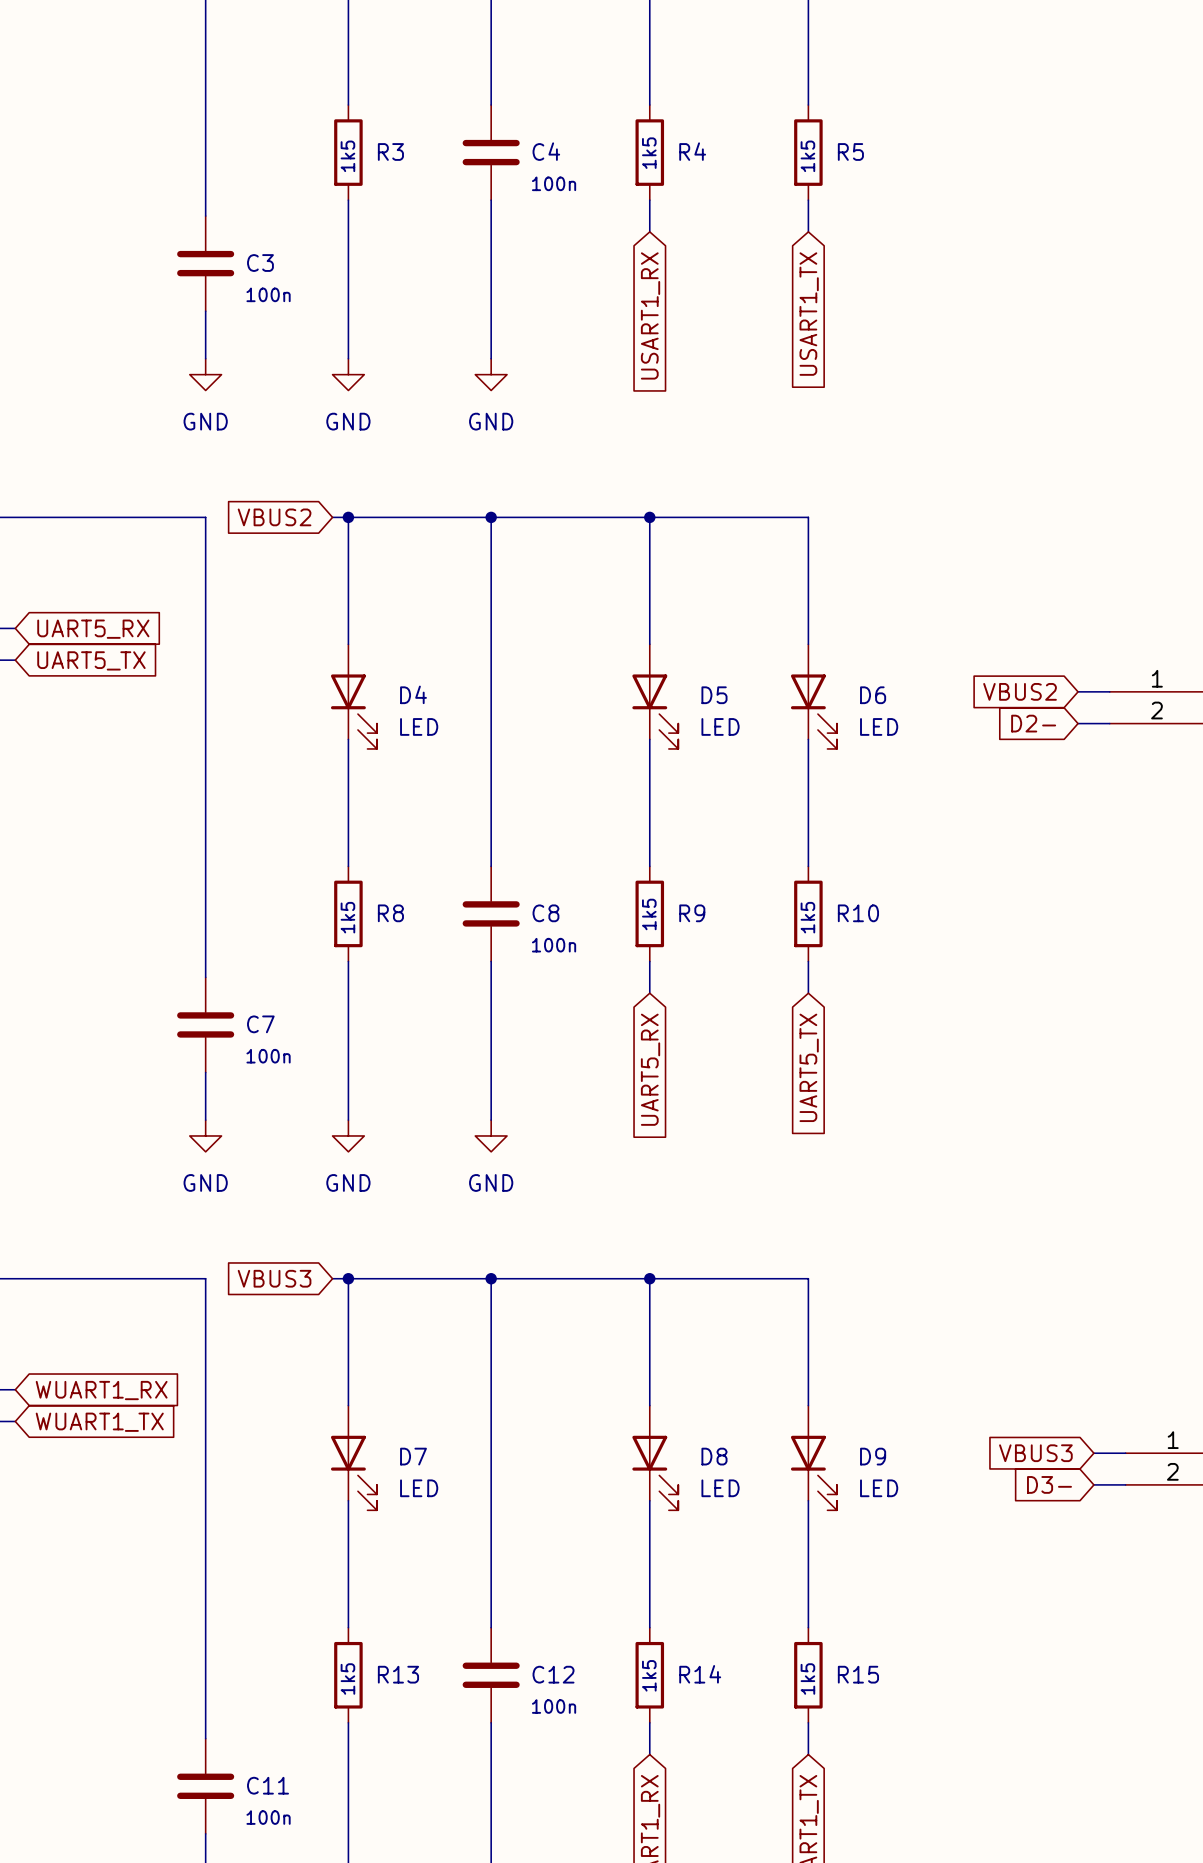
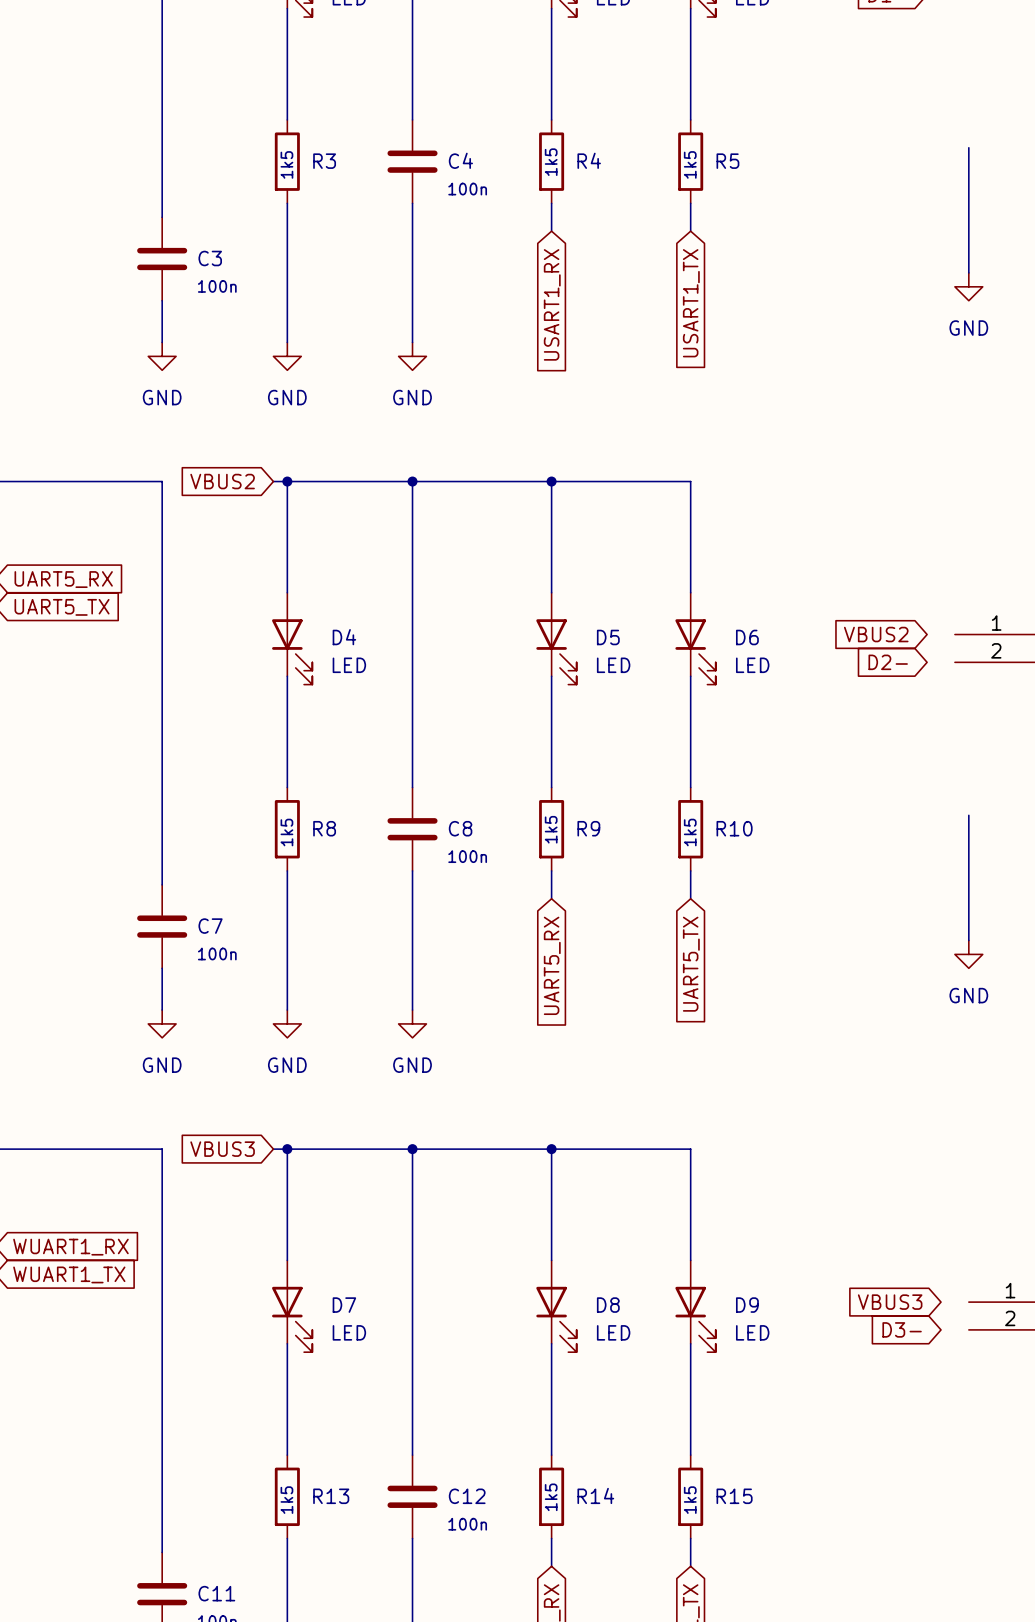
wire: none -> (968, 147) (968, 272)
power symbol: none -> GND (968, 286)
wire: (1078, 691) (1109, 691) -> none
wire: (1078, 723) (1109, 723) -> none
wire: none -> (968, 815) (968, 940)
power symbol: none -> GND (968, 954)
wire: (1093, 1453) (1125, 1453) -> none
wire: (1093, 1484) (1125, 1484) -> none

